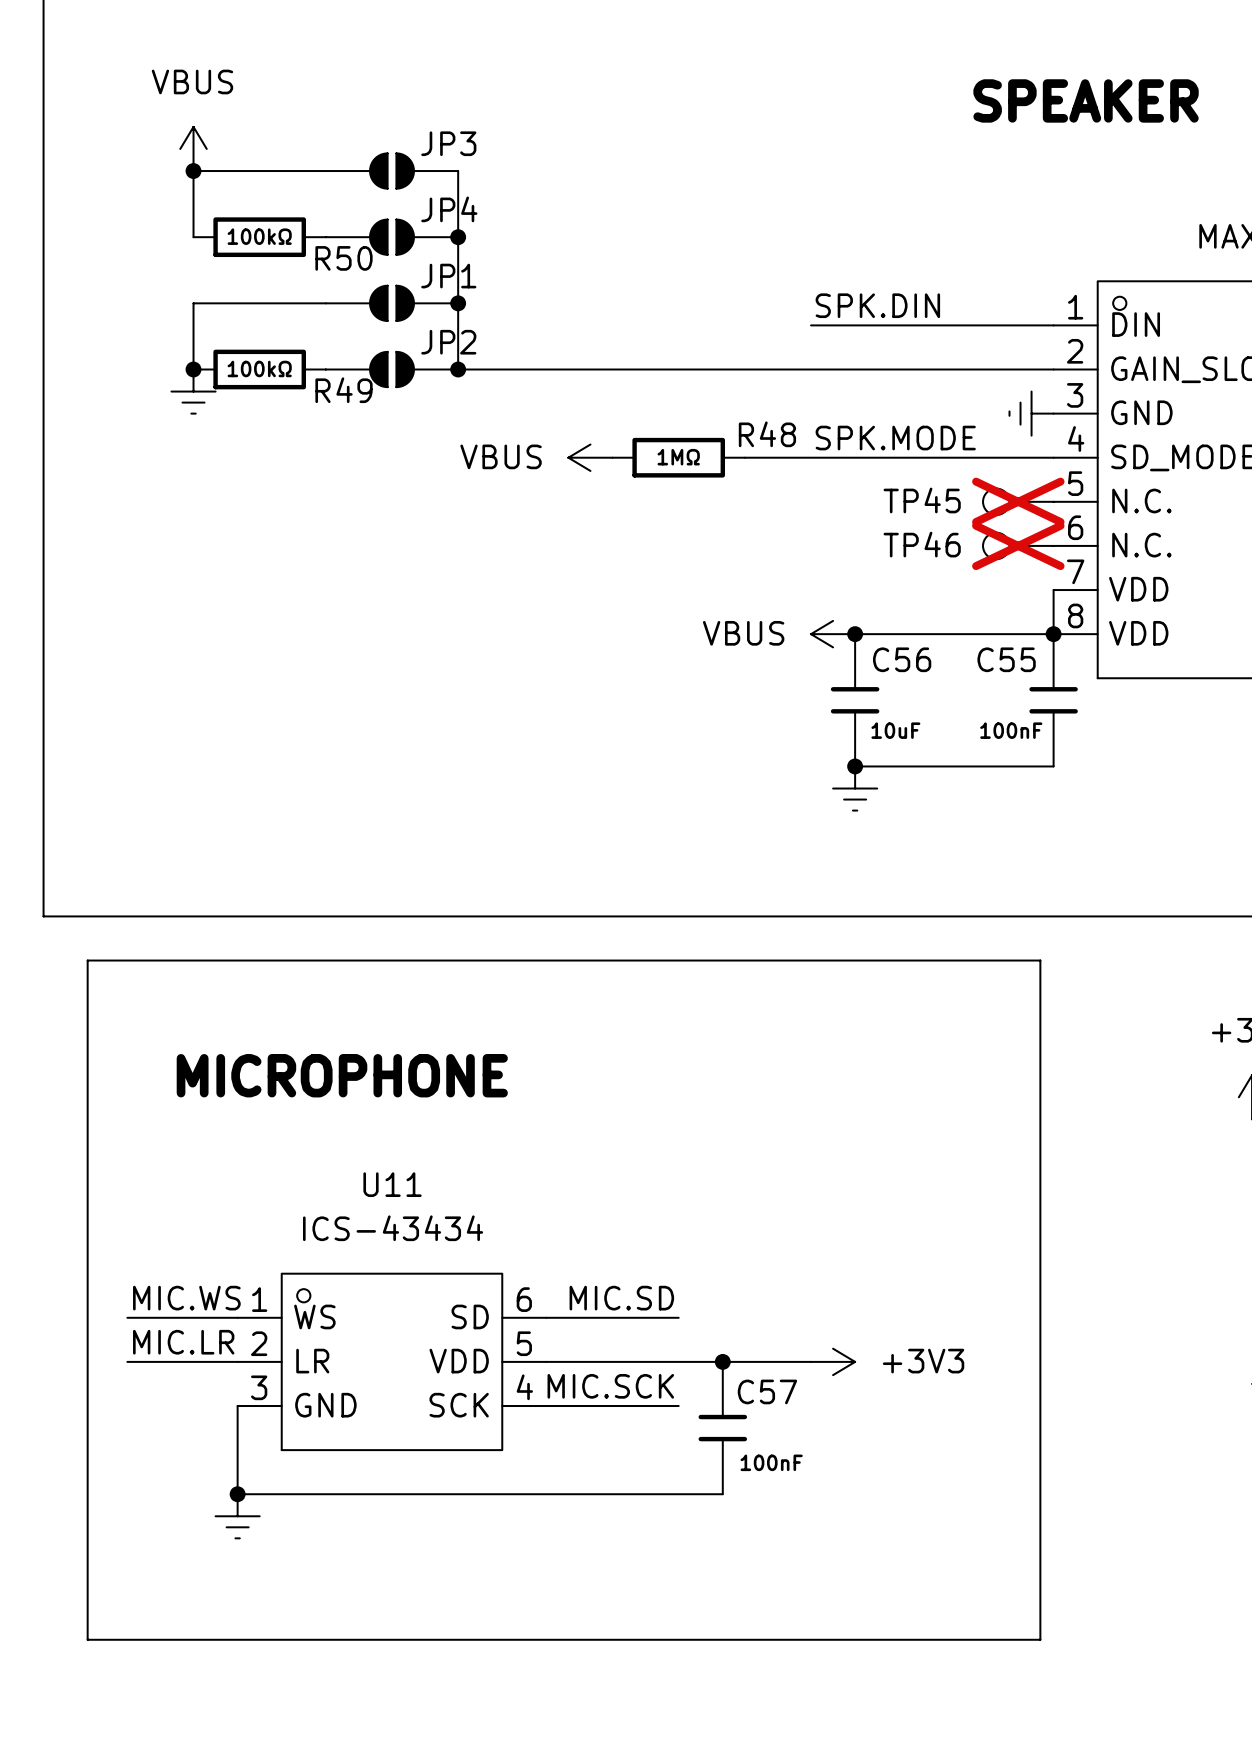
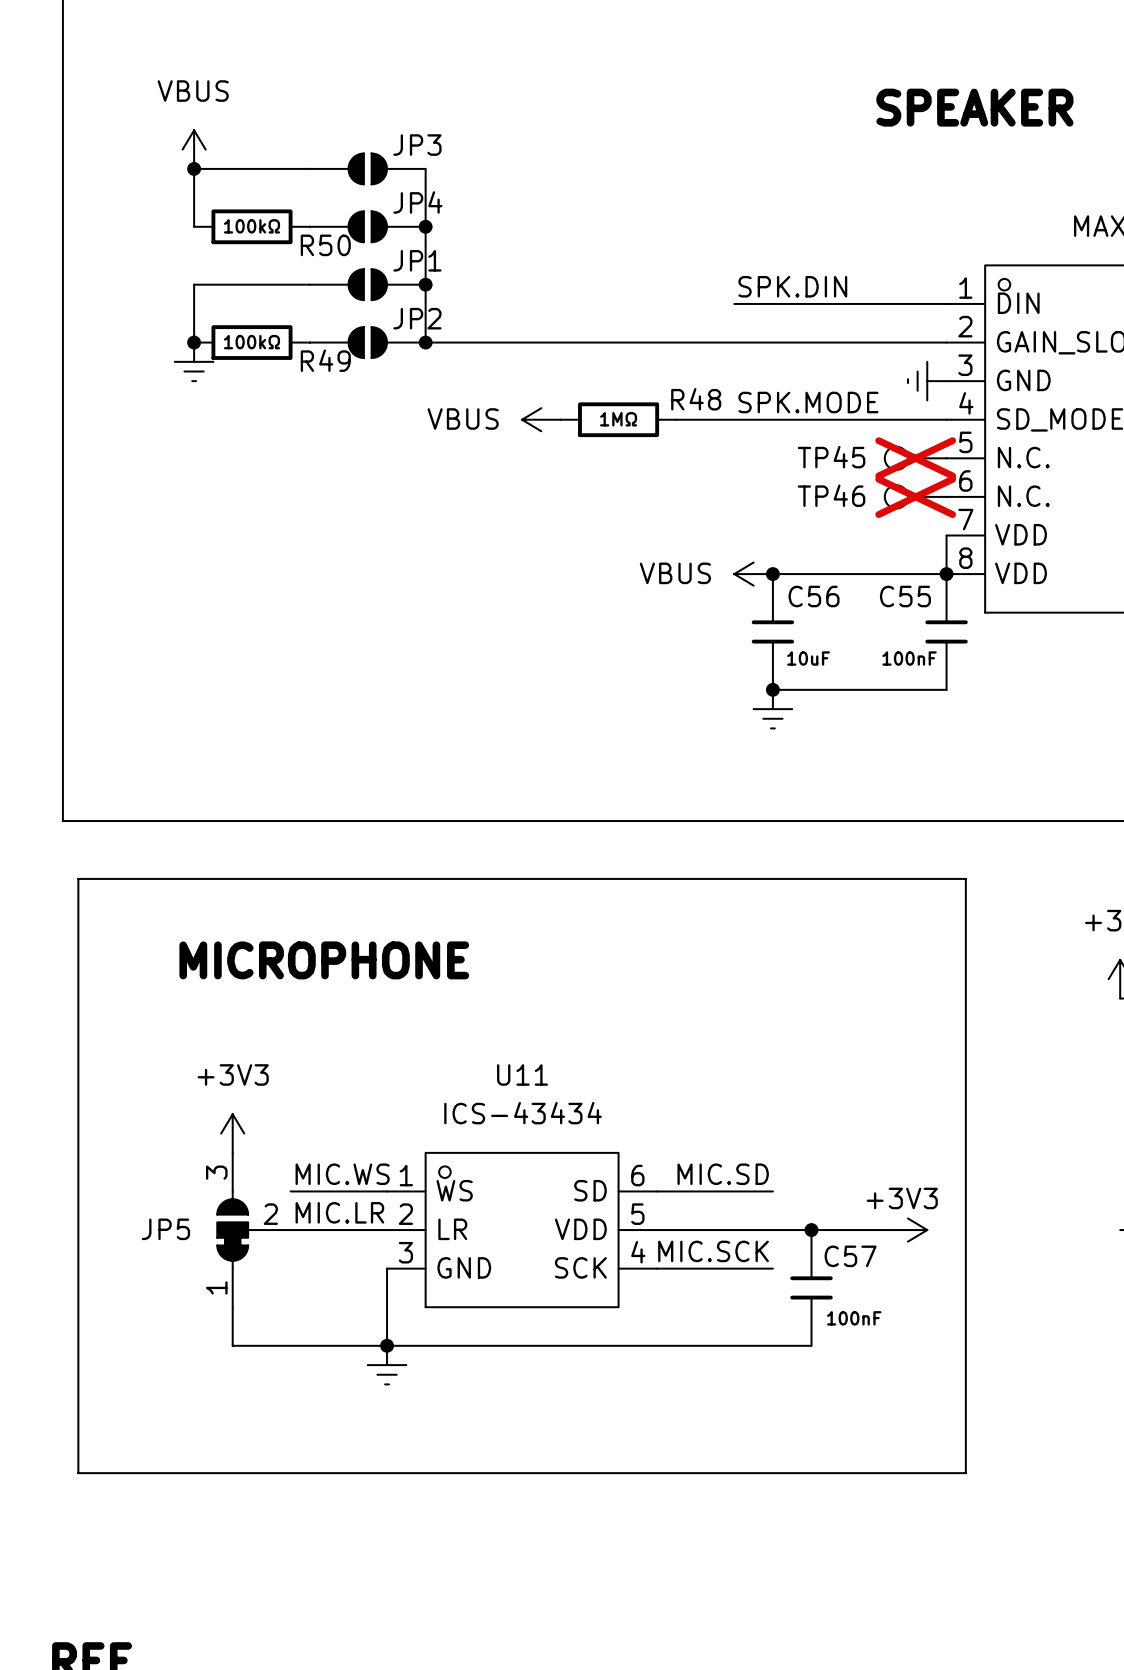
line: (87, 960) (1040, 960) (1040, 1639) (87, 1639) (87, 960) -> (78, 878) (78, 1473) (965, 1473) (965, 878) (78, 878)
power symbol: none -> +3V3 (232, 1133)
label position: MIC.WS (186, 1298) -> MIC.WS (342, 1174)
label position: MIC.SD (621, 1298) -> MIC.SD (723, 1174)
wire: (127, 1317) (237, 1317) -> (290, 1191) (387, 1191)
wire: (546, 1317) (678, 1317) -> (657, 1191) (772, 1191)
label position: MIC.LR (183, 1342) -> MIC.LR (339, 1212)
wire: (127, 1361) (237, 1361) -> (290, 1230) (387, 1230)
U11 position: (392, 1361) -> (522, 1230)
wire: (546, 1361) (811, 1361) -> (657, 1230) (888, 1230)
junction: (722, 1361) -> none
power symbol position: +3V3 (833, 1361) -> +3V3 (907, 1230)
power symbol text position: +3V3 (923, 1361) -> +3V3 (902, 1198)
JP5: none -> (253, 1230)
junction: none -> (811, 1230)
label position: MIC.SCK (610, 1386) -> MIC.SCK (713, 1251)
wire: (546, 1406) (678, 1406) -> (657, 1268) (772, 1268)
wire: none -> (387, 1268) (387, 1345)
C57 position: (722, 1428) -> (811, 1287)
wire: (237, 1494) (722, 1494) -> (232, 1326) (232, 1345) (811, 1345)
junction: (237, 1494) -> none
power symbol position: (237, 1516) -> (387, 1365)
junction: none -> (387, 1345)

